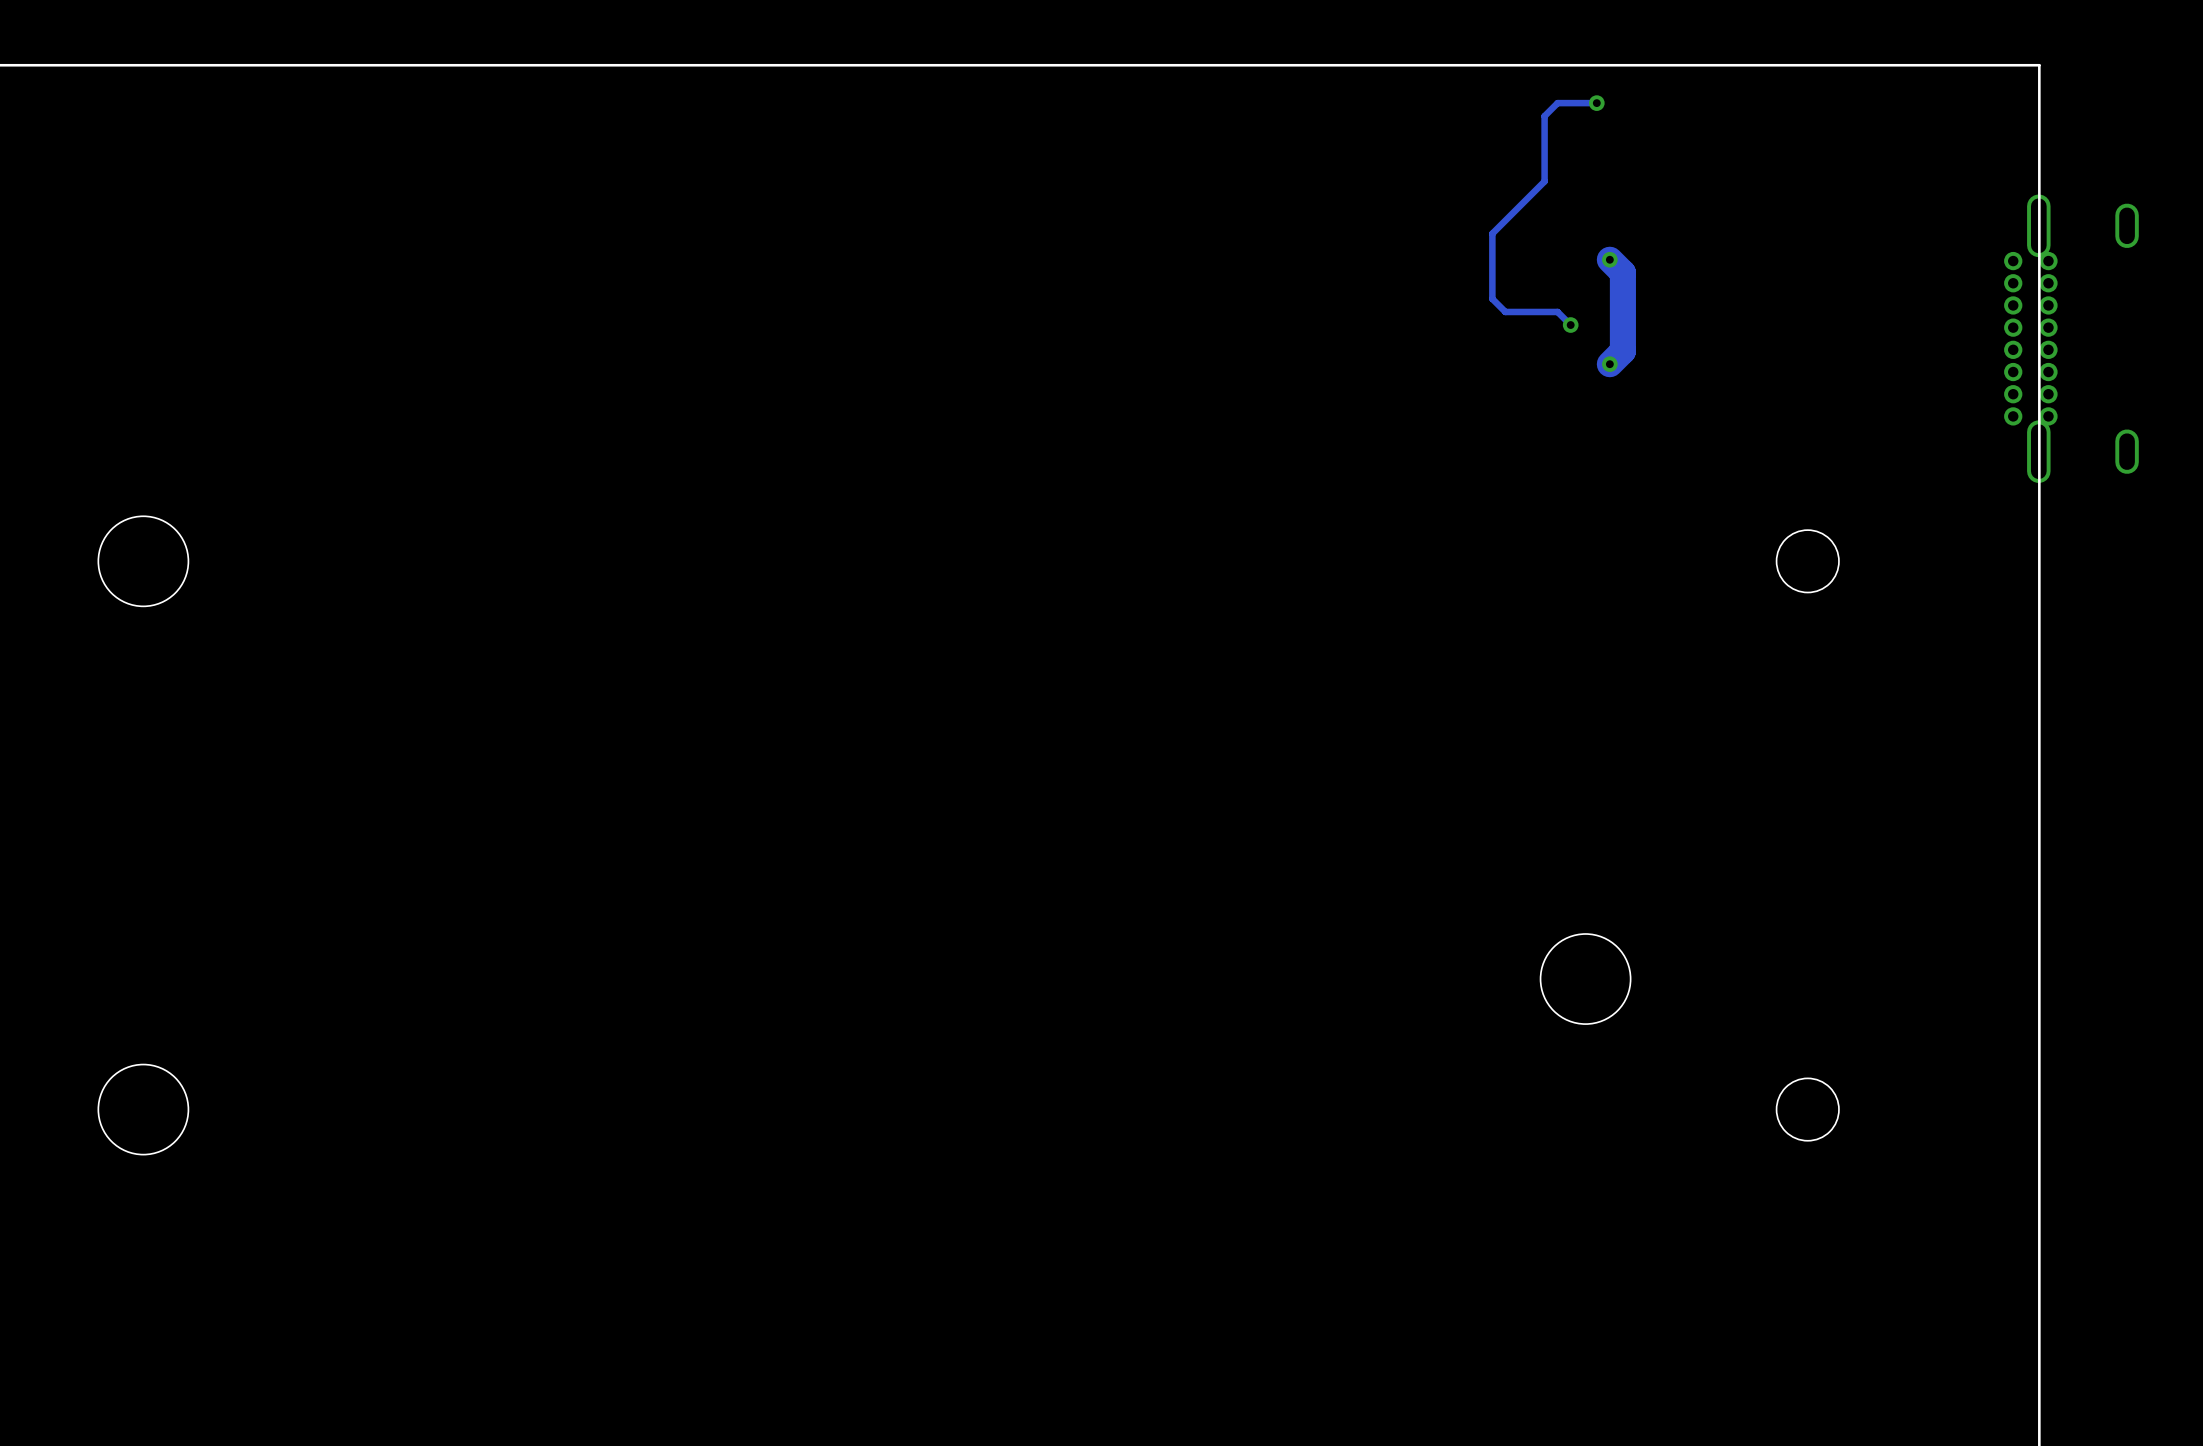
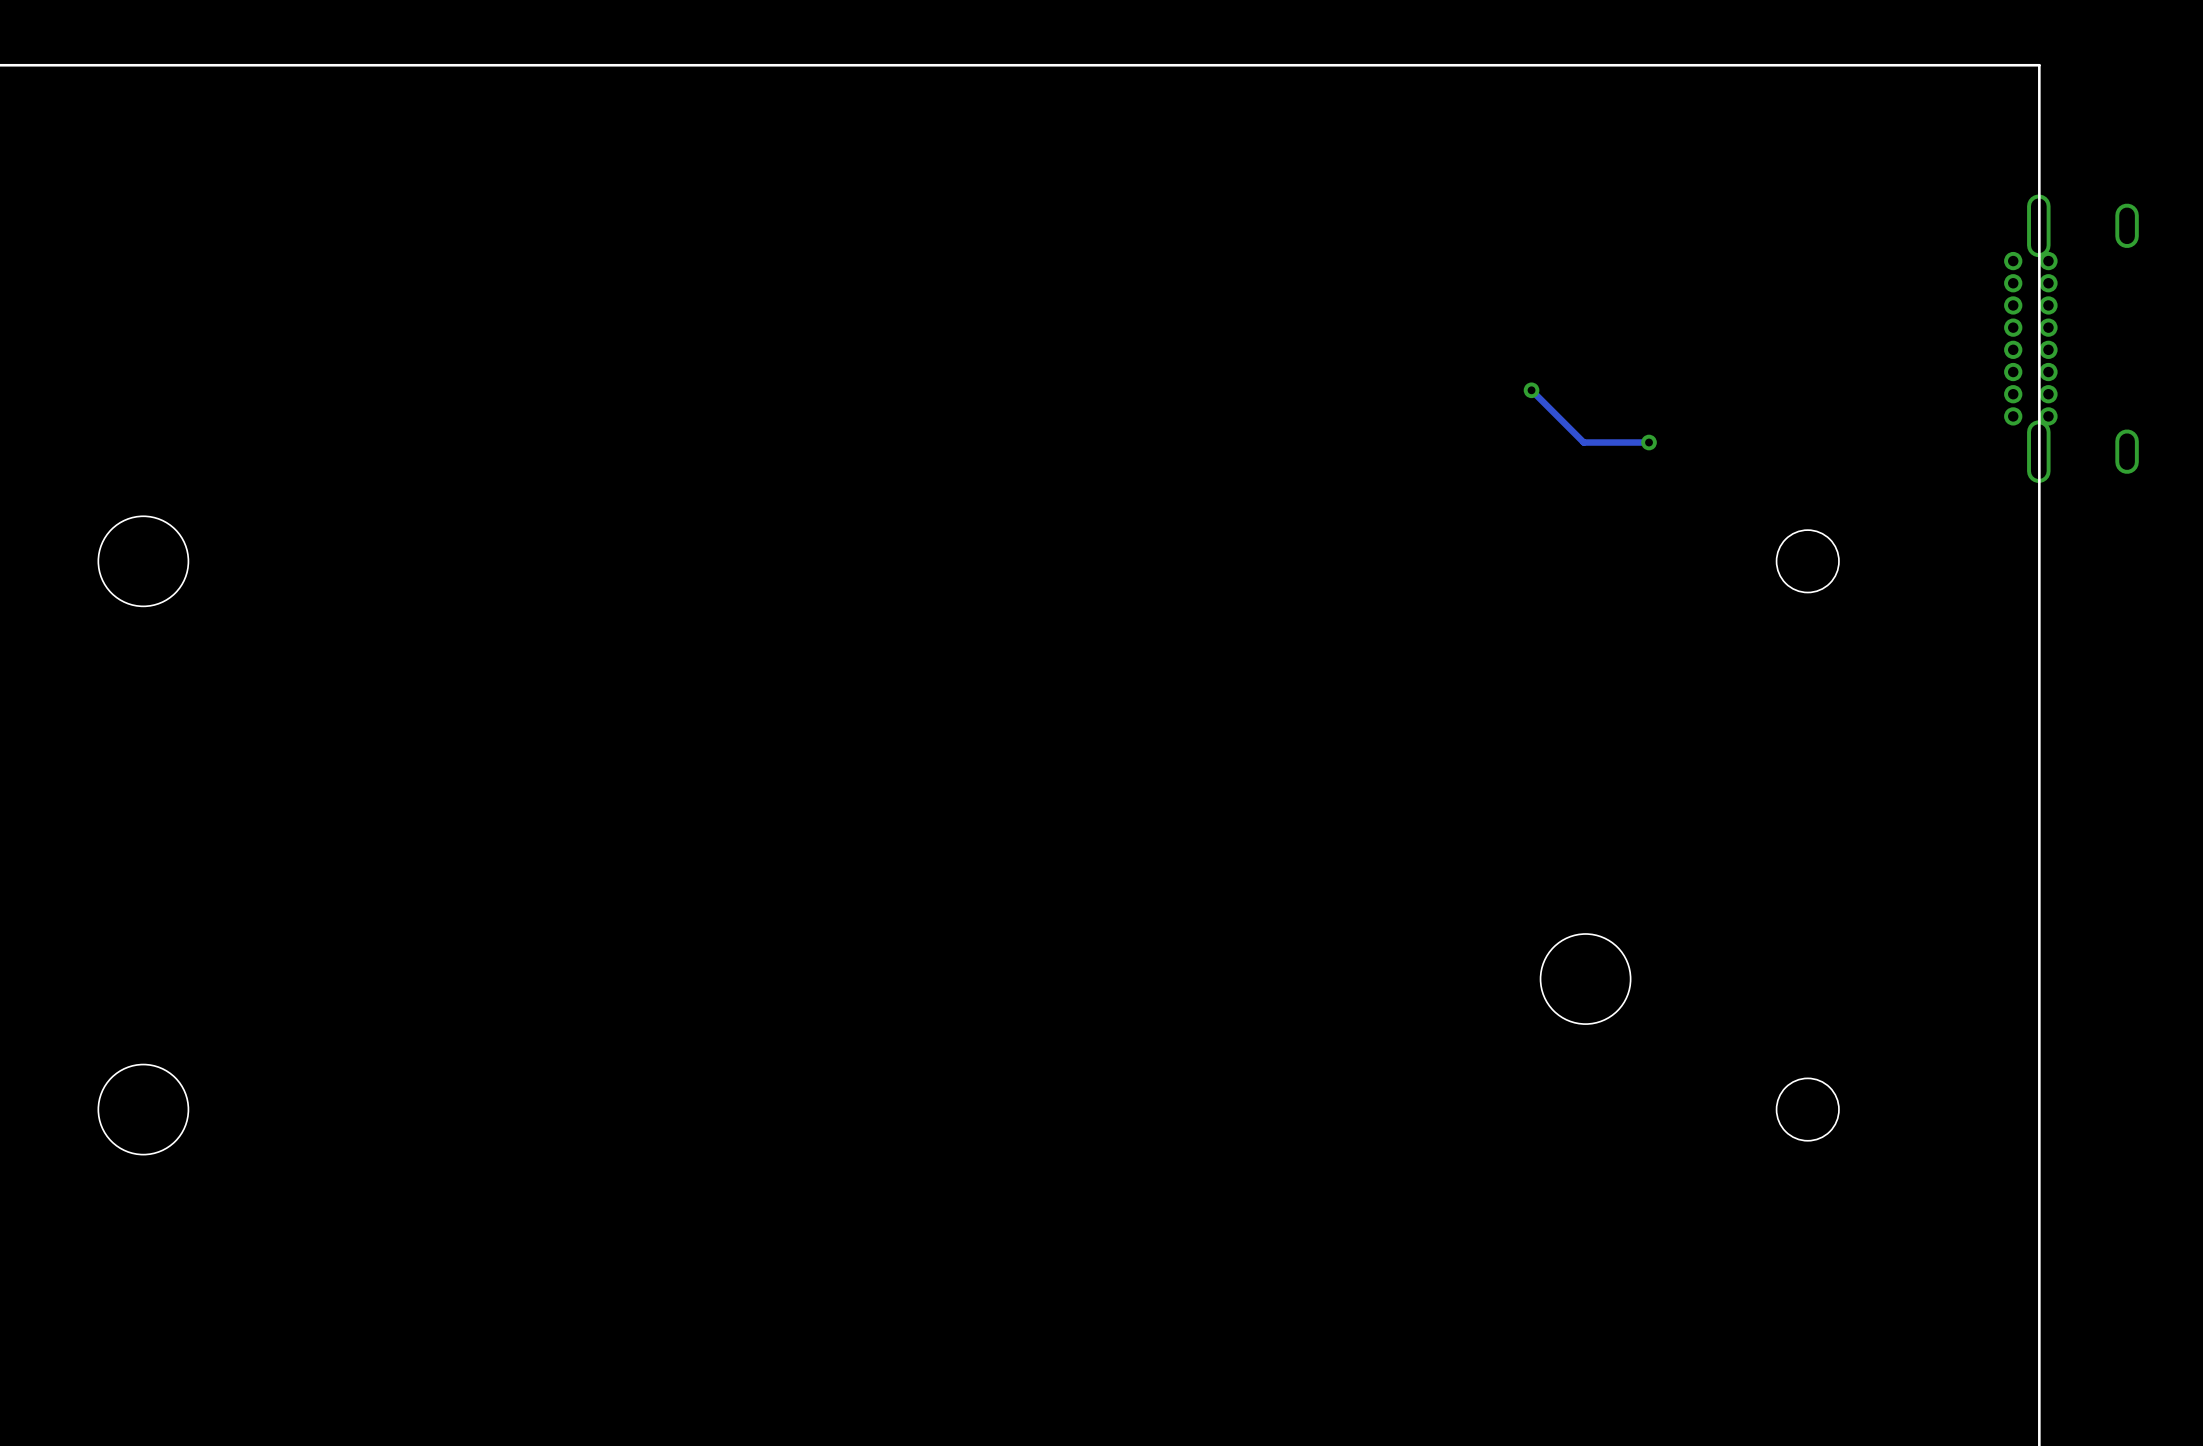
track: (1596, 103) (1557, 103) (1544, 116) (1544, 181) (1492, 233) (1492, 298) (1505, 311) (1557, 311) (1570, 325) -> none
via: (1596, 103) -> none
track: (1609, 259) (1622, 272) (1622, 351) (1609, 364) -> none
via: (1609, 259) -> none
via: (1570, 325) -> none
via: (1609, 364) -> none
track: none -> (1531, 390) (1583, 442) (1649, 442)
via: none -> (1531, 390)
via: none -> (1649, 442)

